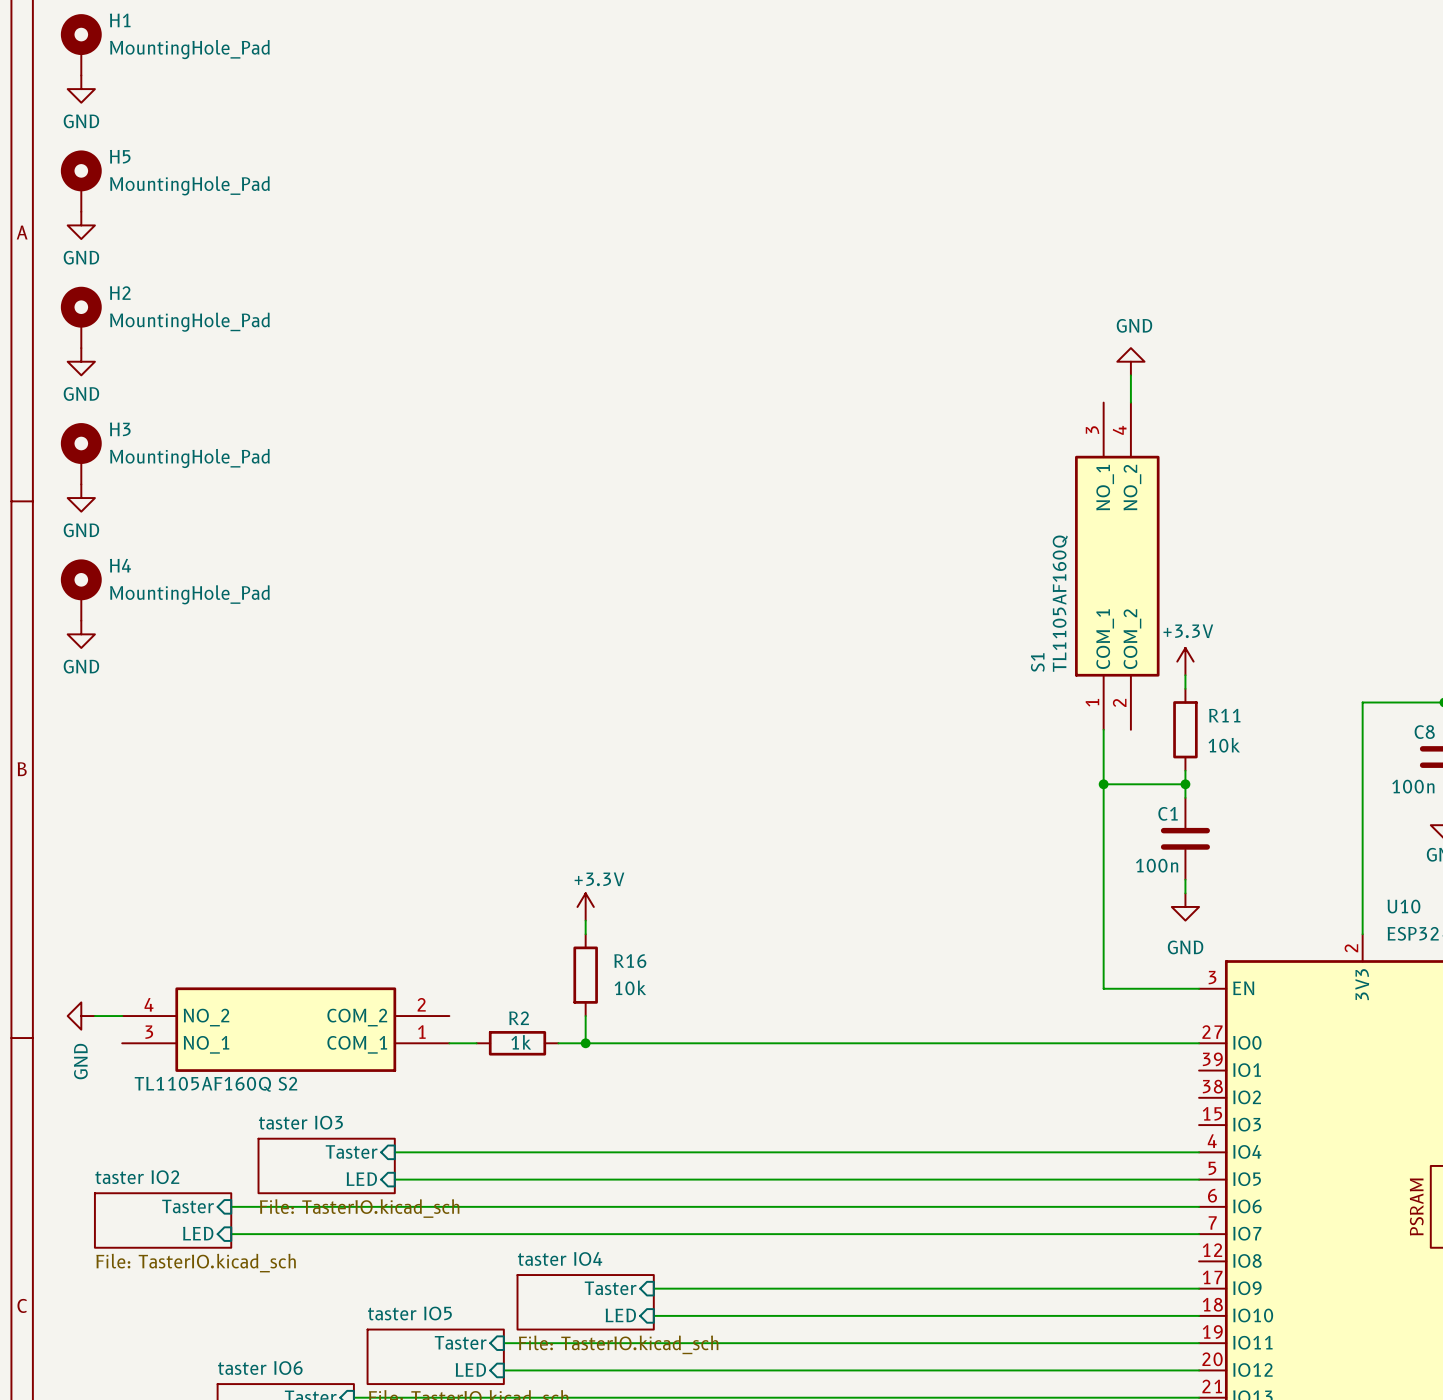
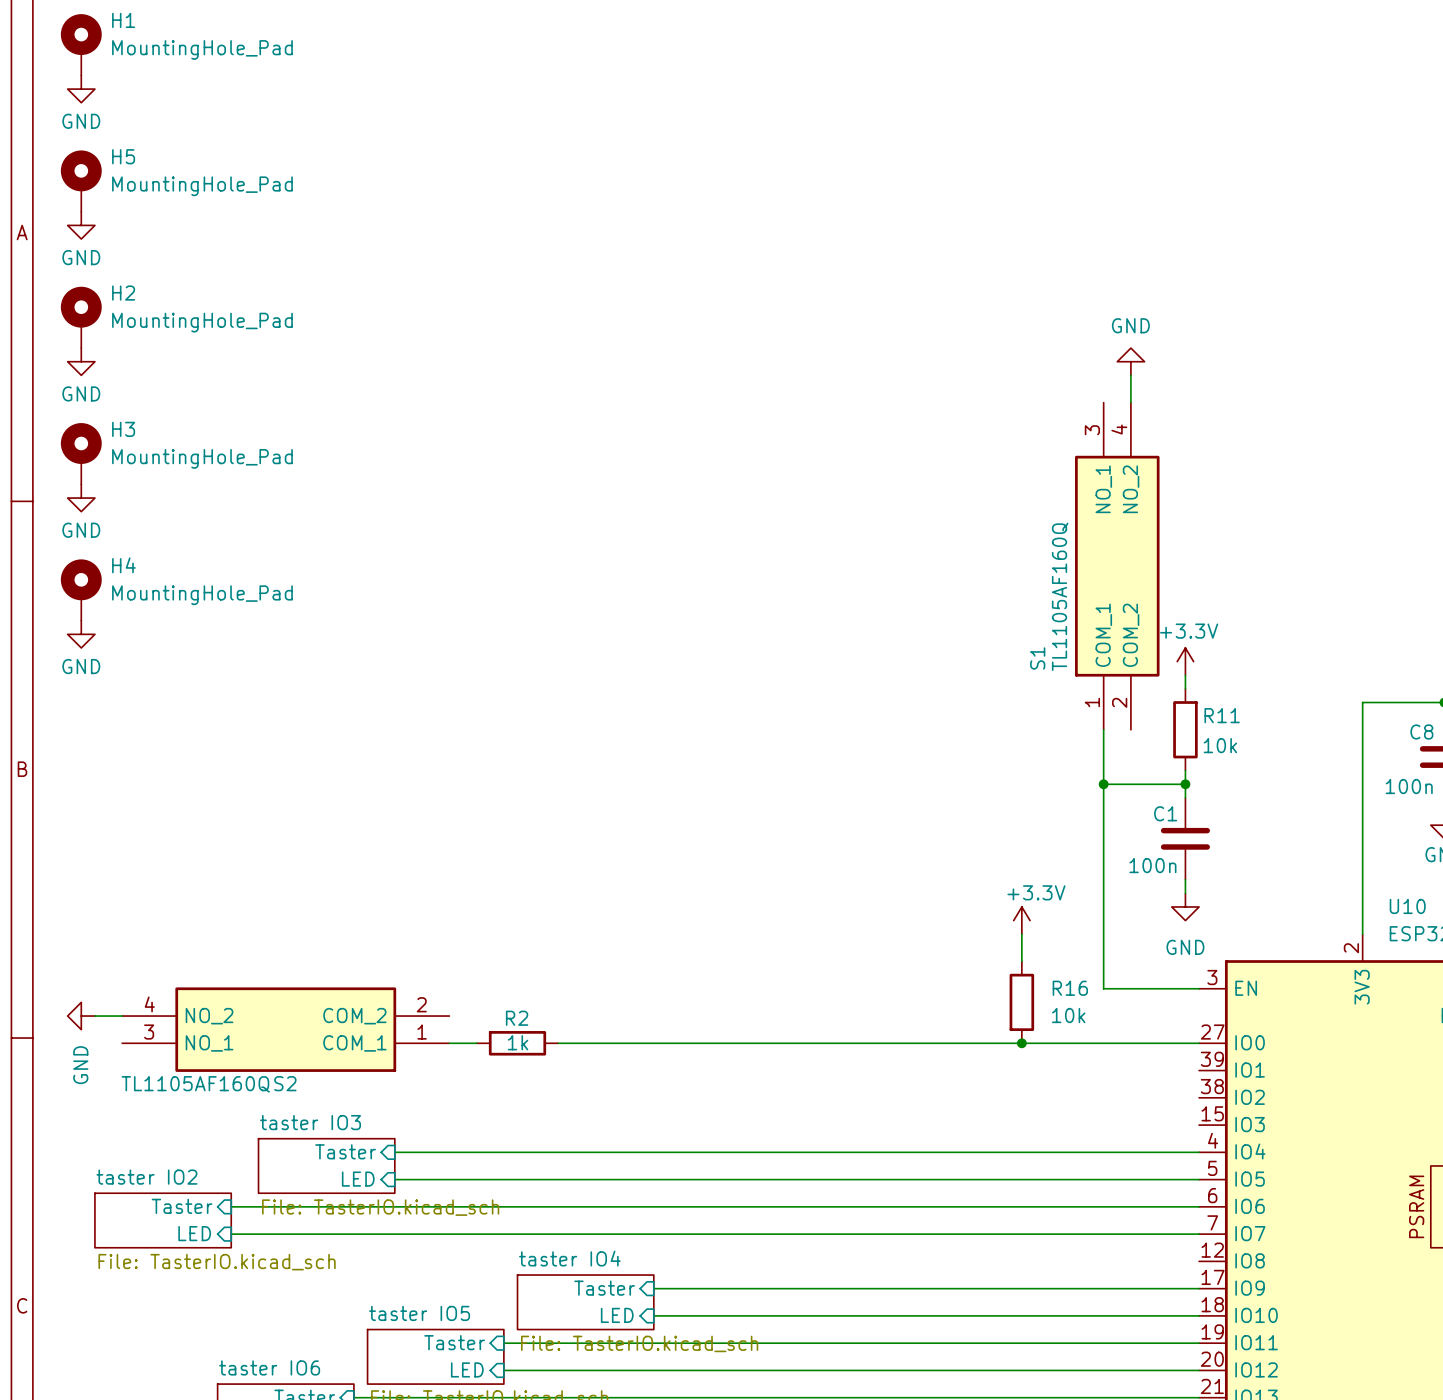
power symbol: +3.3V (585, 906) -> none
wire: (585, 920) (585, 934) -> none
power symbol: none -> +3.3V (1021, 920)
wire: none -> (1021, 934) (1021, 961)
R16 position: (585, 975) -> (1021, 1002)
wire: (585, 1016) (585, 1043) -> none
junction: (585, 1043) -> none
junction: none -> (1021, 1043)

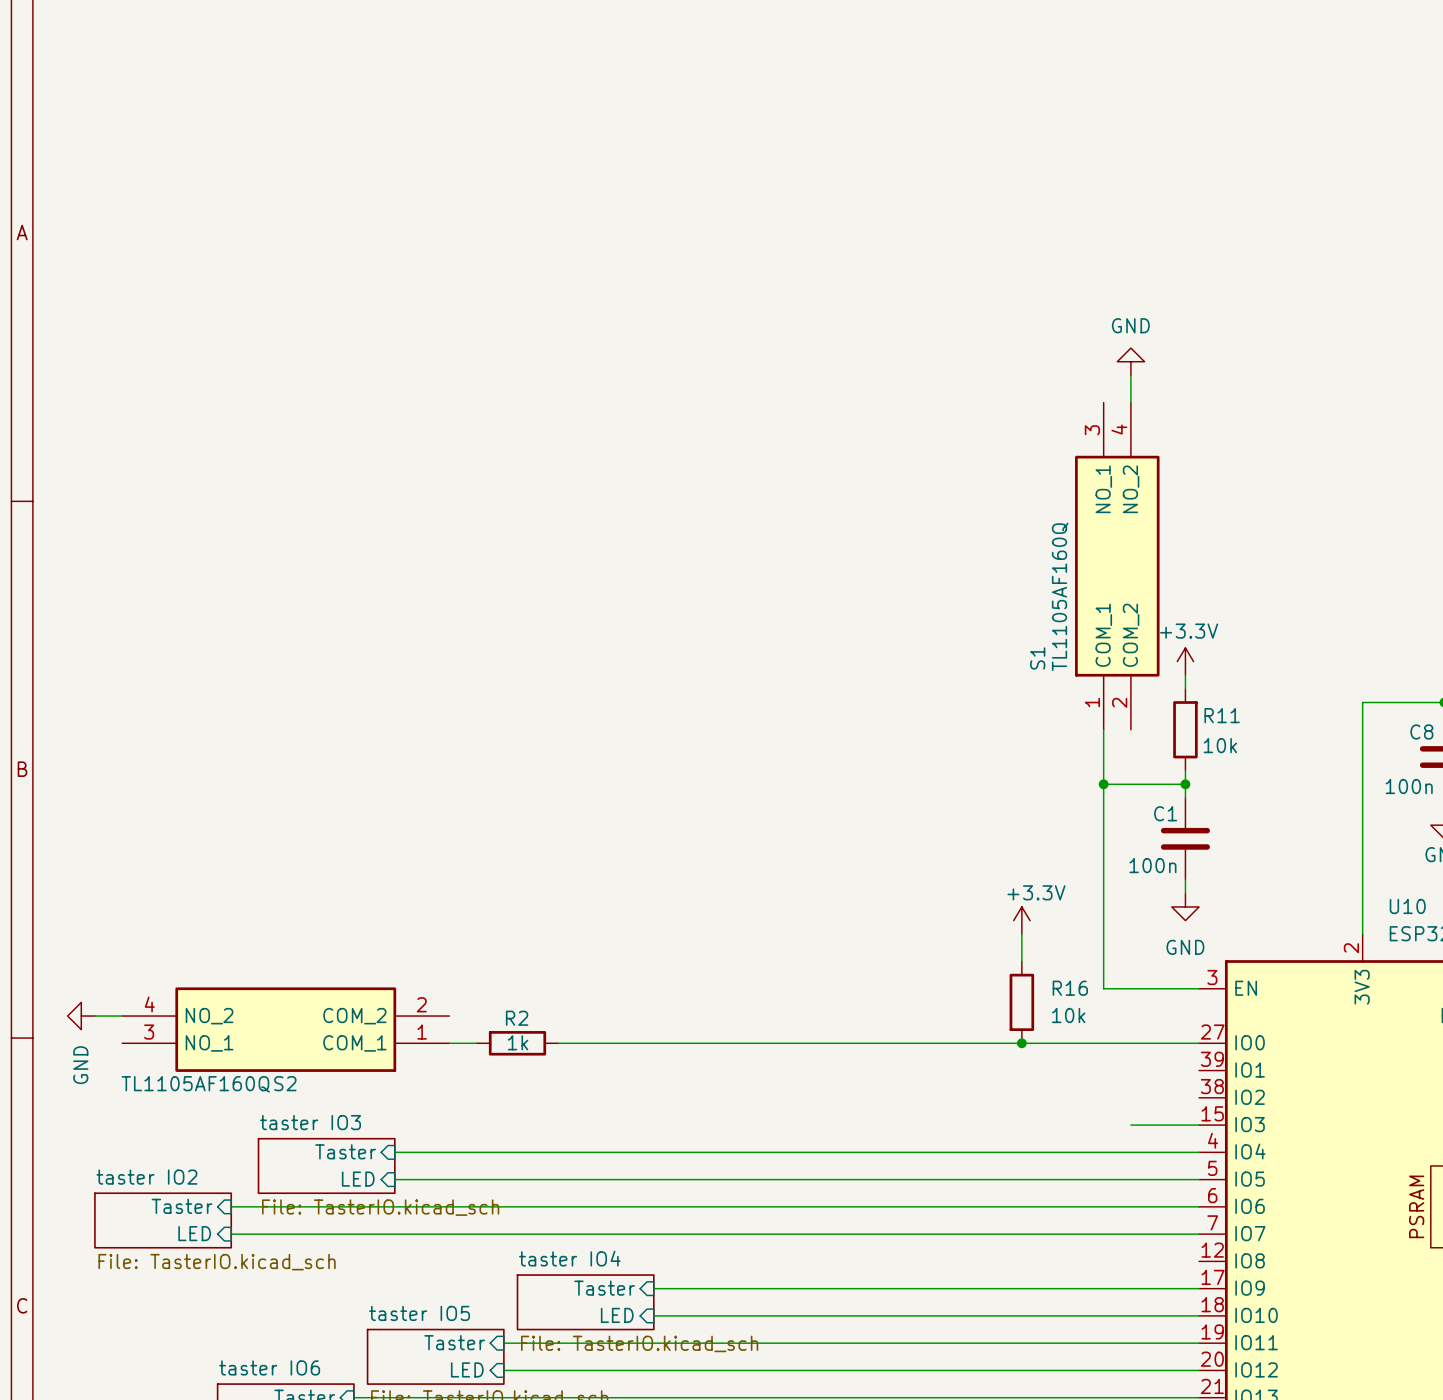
H1: MountingHole_Pad (81, 44) -> none
power symbol: GND (81, 89) -> none
H5: MountingHole_Pad (81, 181) -> none
power symbol: GND (81, 225) -> none
H2: MountingHole_Pad (81, 317) -> none
power symbol: GND (81, 361) -> none
H3: MountingHole_Pad (81, 453) -> none
power symbol: GND (81, 498) -> none
H4: MountingHole_Pad (81, 590) -> none
power symbol: GND (81, 634) -> none
wire: none -> (1130, 1125) (1199, 1125)

